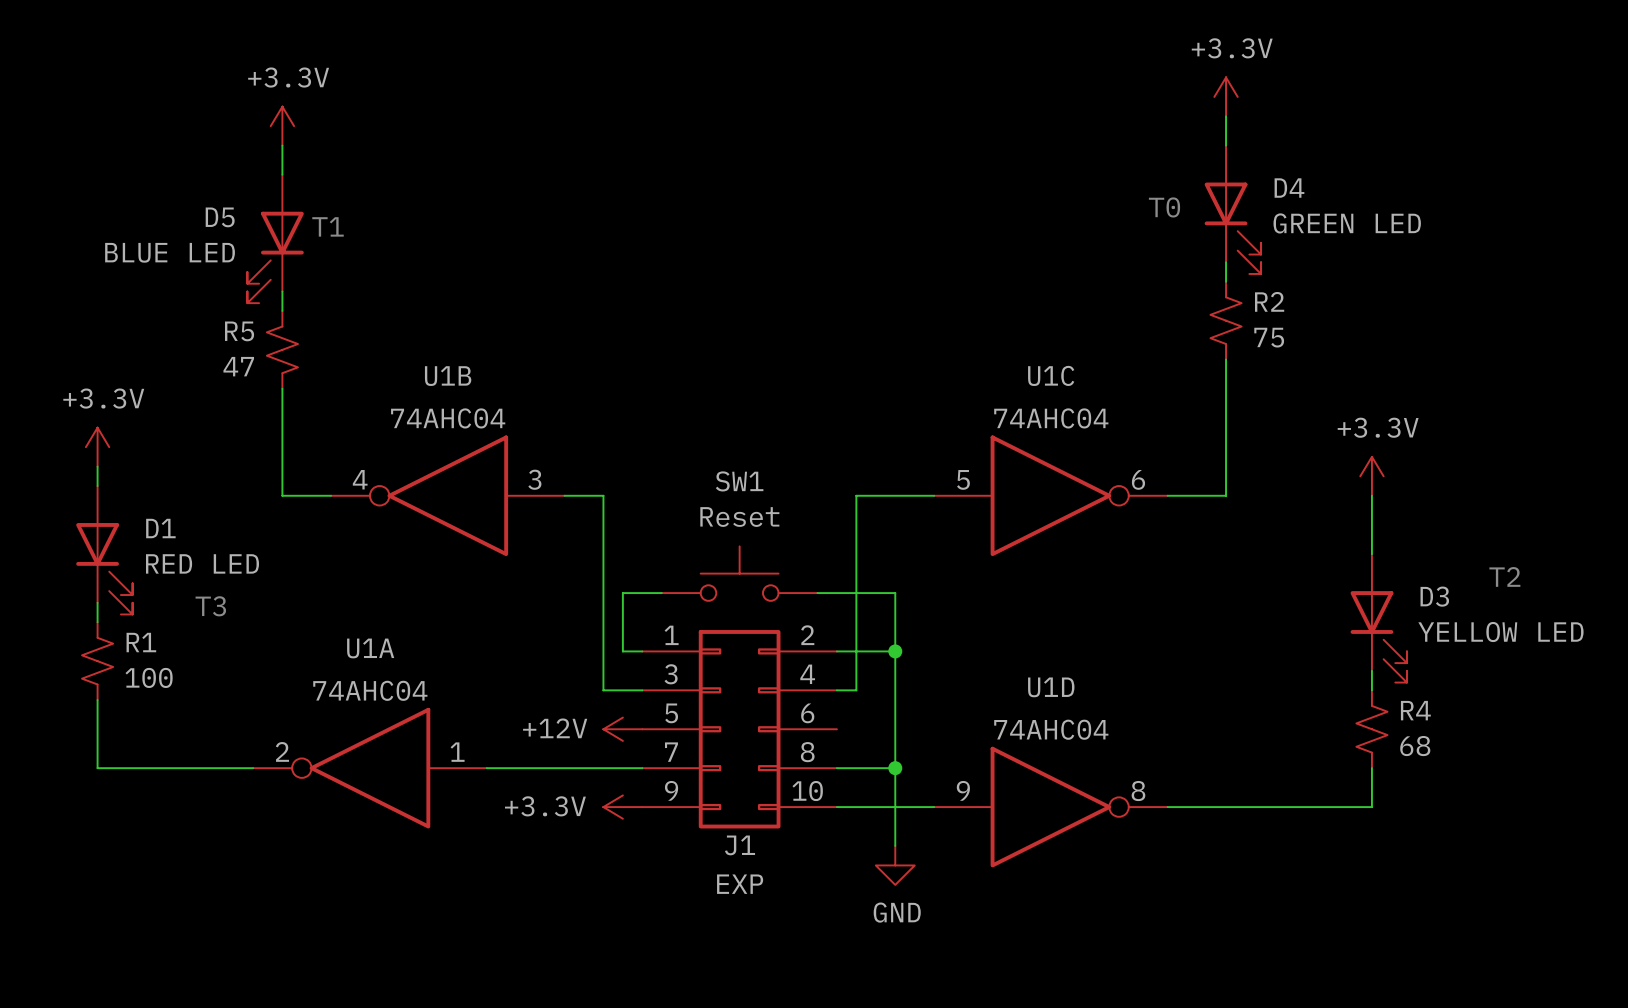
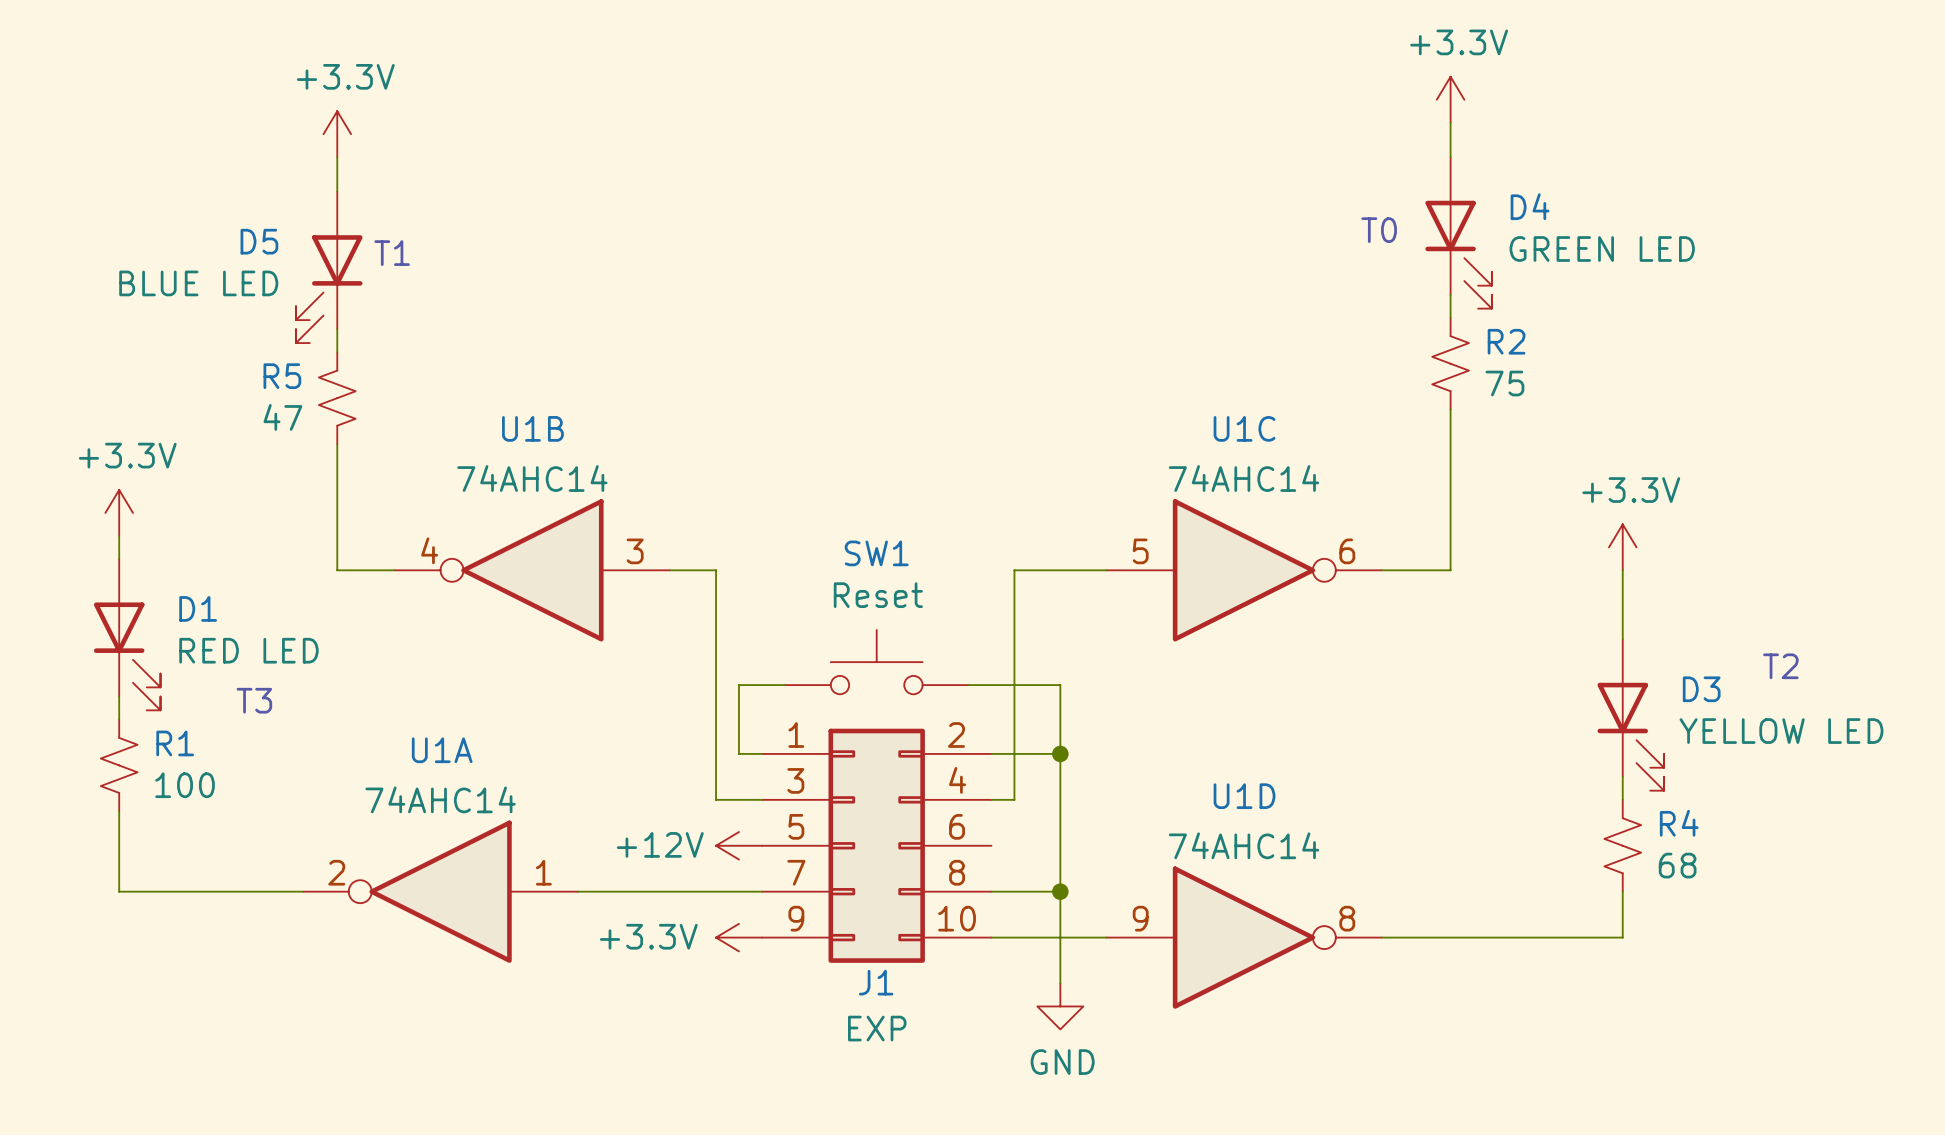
U1B value: 74AHC04 (448, 418) -> 74AHC14 (532, 478)
U1C value: 74AHC04 (1051, 418) -> 74AHC14 (1243, 478)
U1A value: 74AHC04 (370, 690) -> 74AHC14 (440, 799)
U1D value: 74AHC04 (1051, 729) -> 74AHC14 (1243, 845)

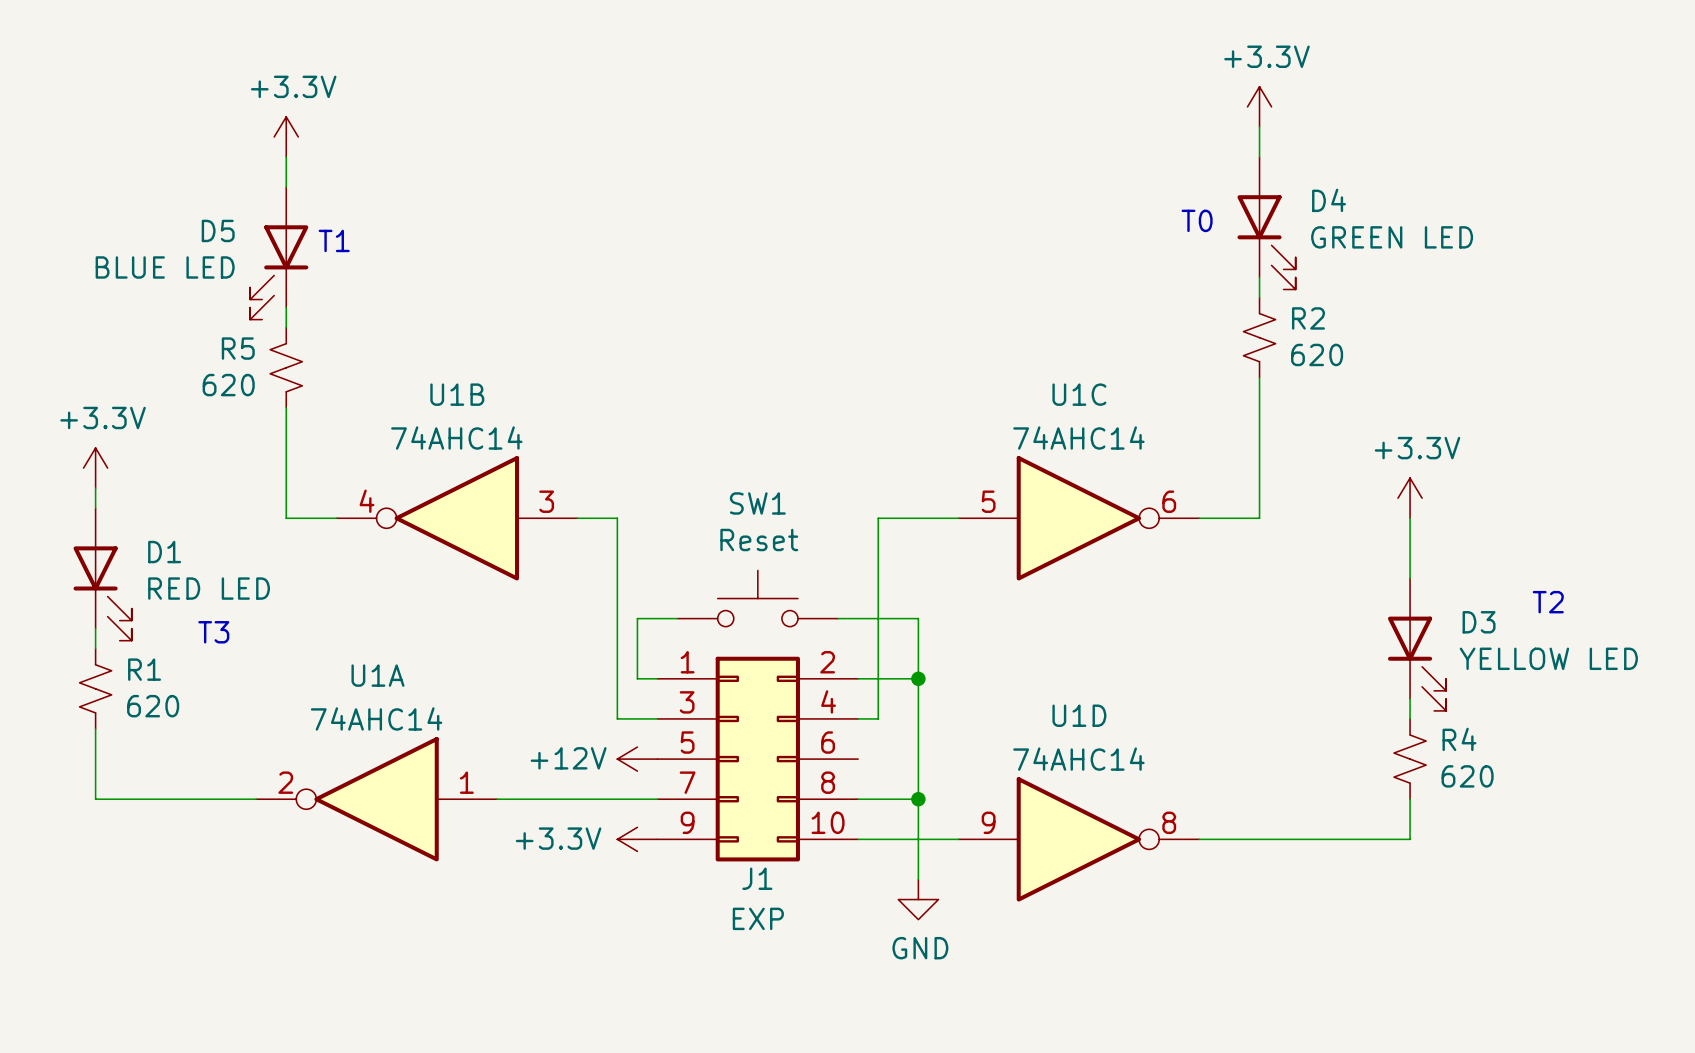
R2 value: 75 (1504, 383) -> 620 (1317, 354)
R5 value: 47 (282, 417) -> 620 (228, 385)
R1 value: 100 (185, 785) -> 620 (153, 706)
R4 value: 68 (1677, 865) -> 620 (1467, 776)

